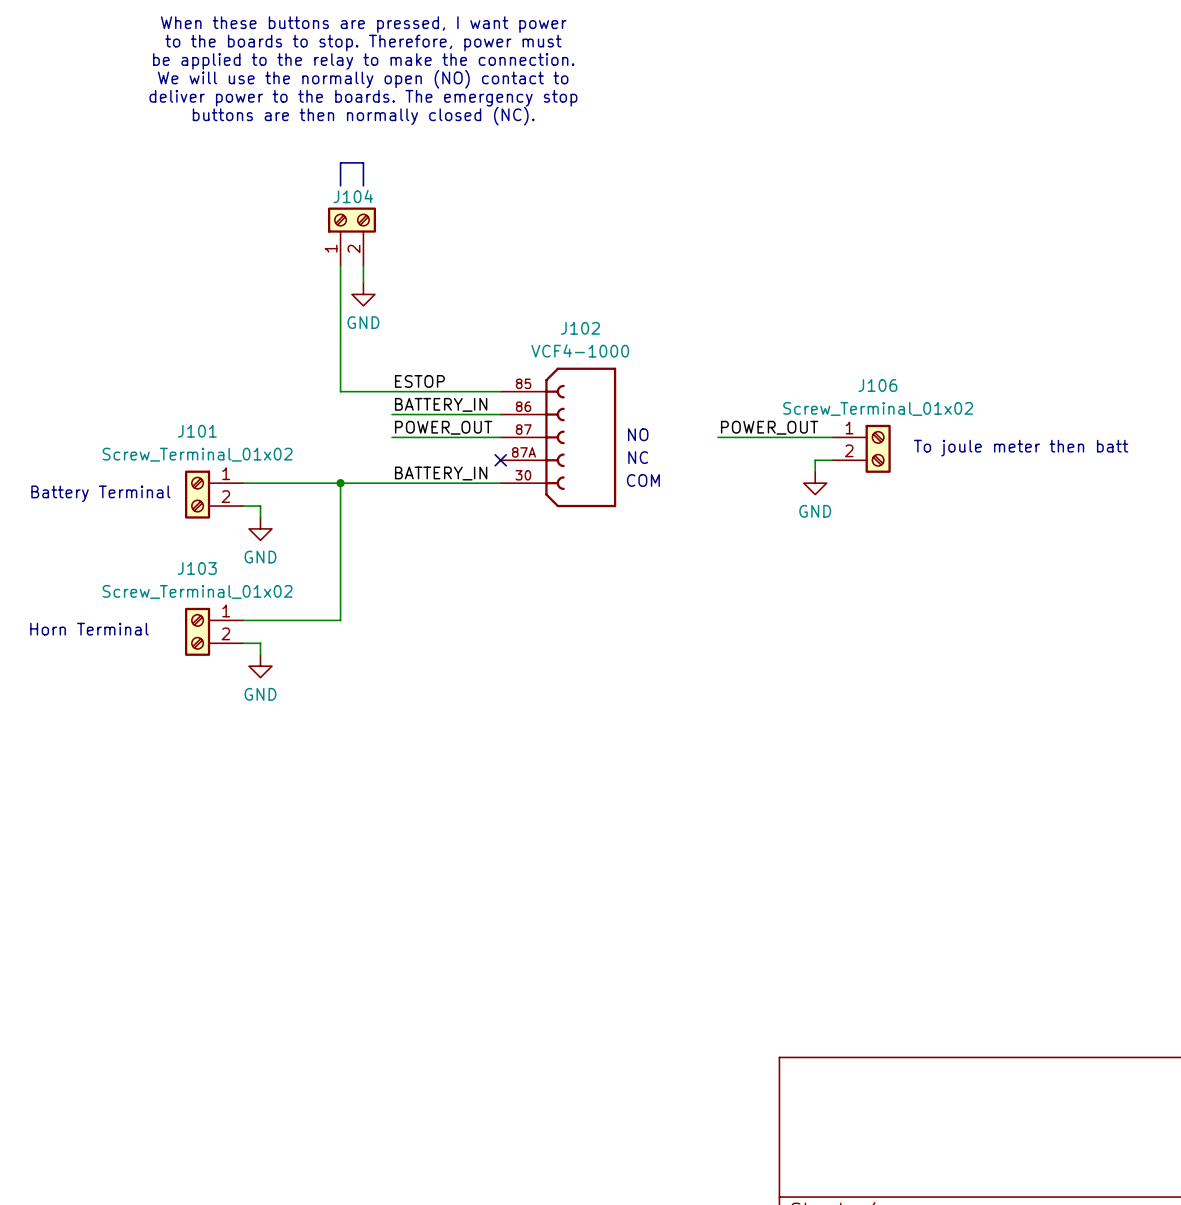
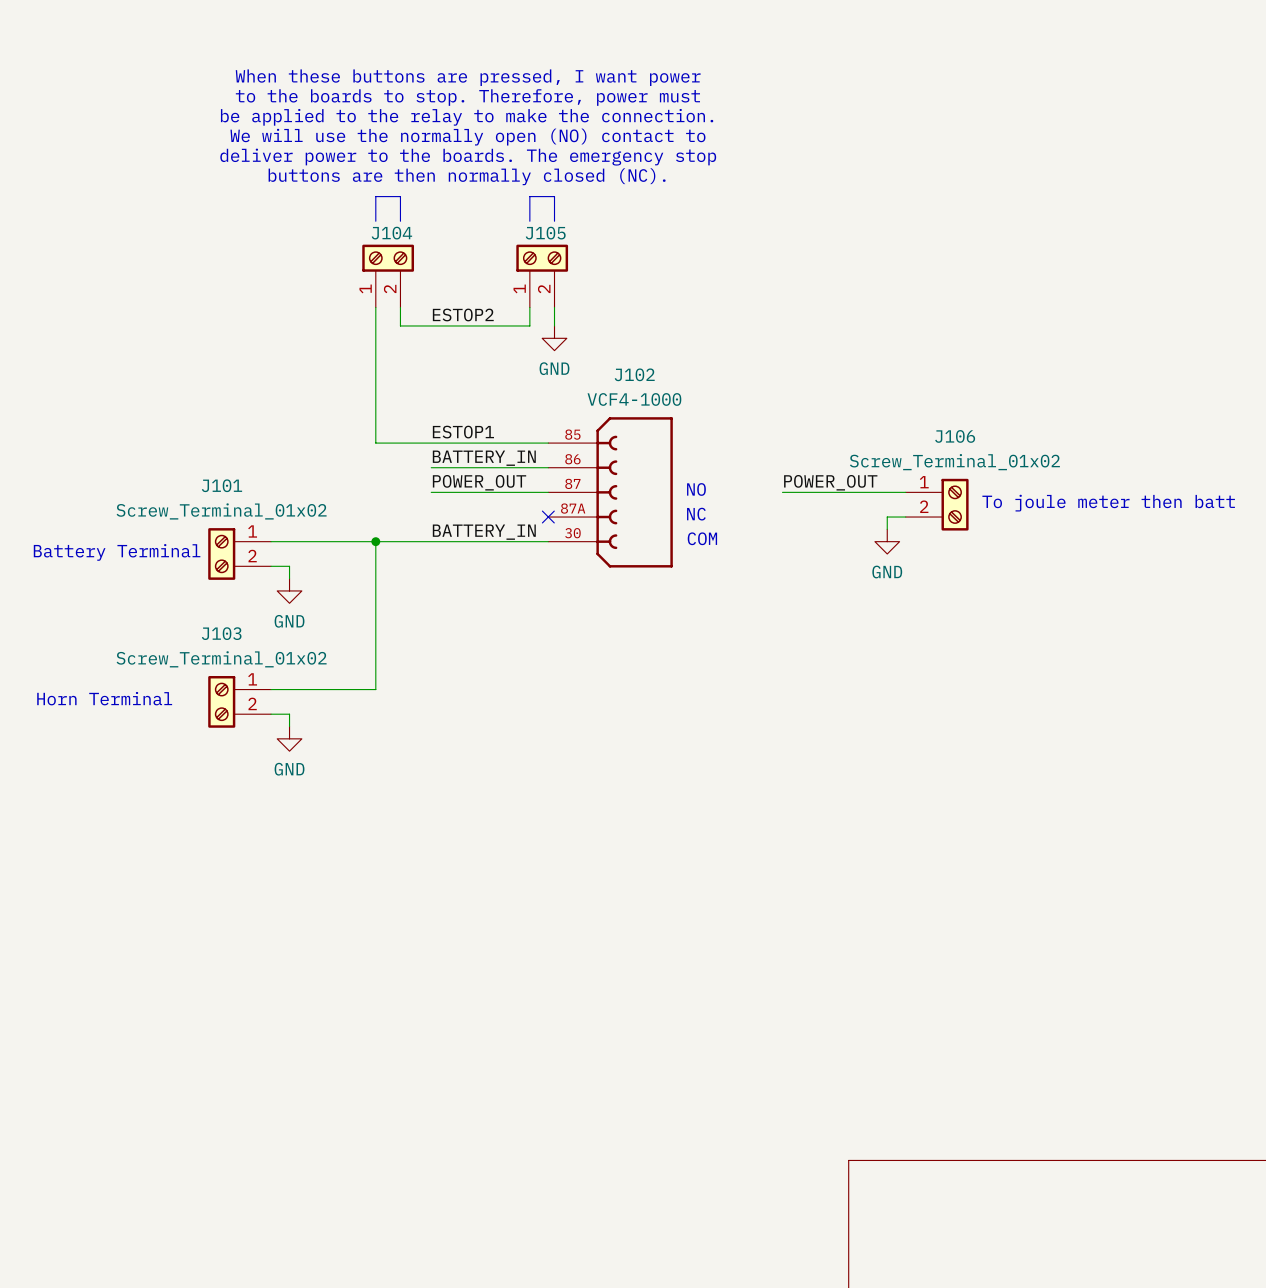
text position: When these buttons are pressed, I want power (363, 24) -> When these buttons are pressed, I want power (468, 77)
text position: to the boards to stop. Therefore, power must (363, 43) -> to the boards to stop. Therefore, power must (467, 97)
text position: be applied to the relay to make the connection. (363, 61) -> be applied to the relay to make the connection. (467, 117)
text position: We will use the normally open (NO) contact to (363, 79) -> We will use the normally open (NO) contact to (467, 137)
text position: deliver power to the boards. The emergency stop (363, 98) -> deliver power to the boards. The emergency stop (468, 157)
text position: buttons are then normally closed (NC). (363, 116) -> buttons are then normally closed (NC). (467, 176)
line: none -> (529, 221) (529, 196) (554, 196) (554, 221)
J105: none -> (542, 276)
wire: none -> (529, 307) (529, 325) (400, 325)
wire: none -> (554, 307) (554, 325)
label: none -> ESTOP2 (463, 314)
power symbol position: GND (363, 294) -> GND (554, 338)
label: ESTOP (419, 381) -> ESTOP1 (463, 432)

